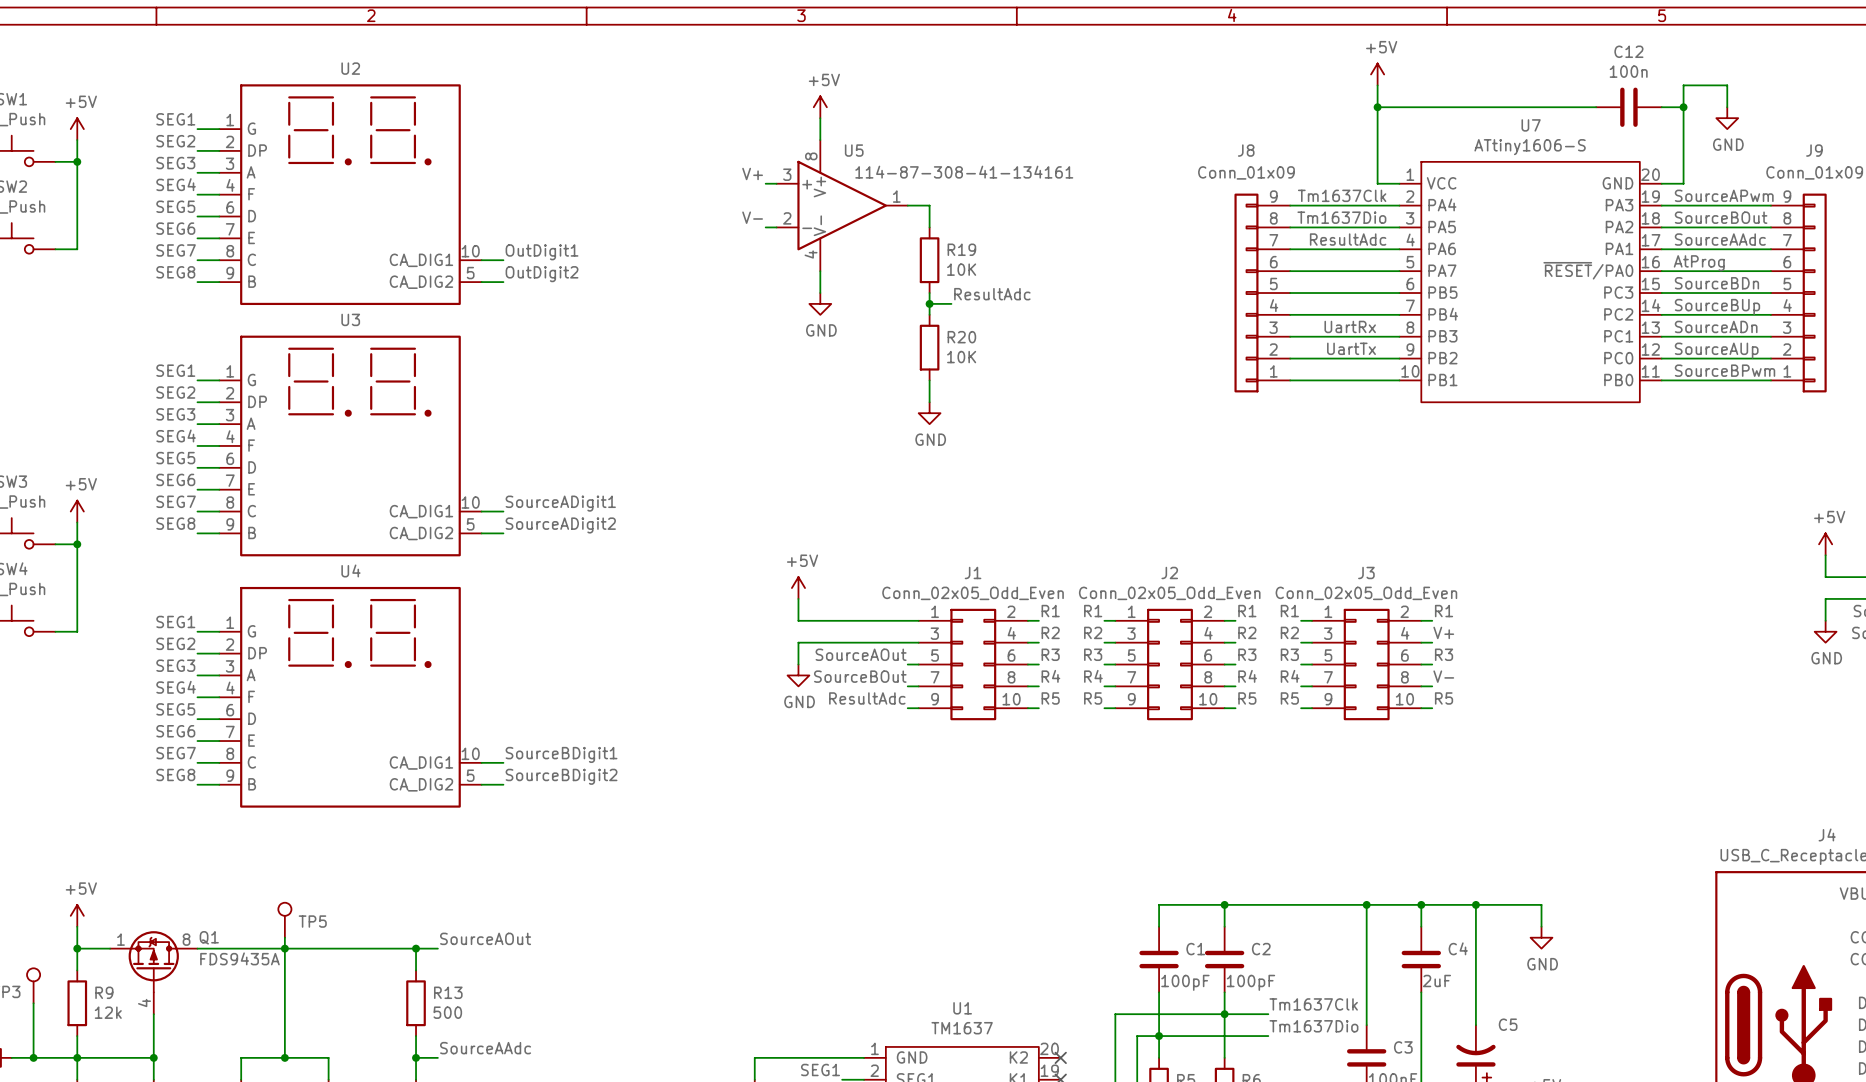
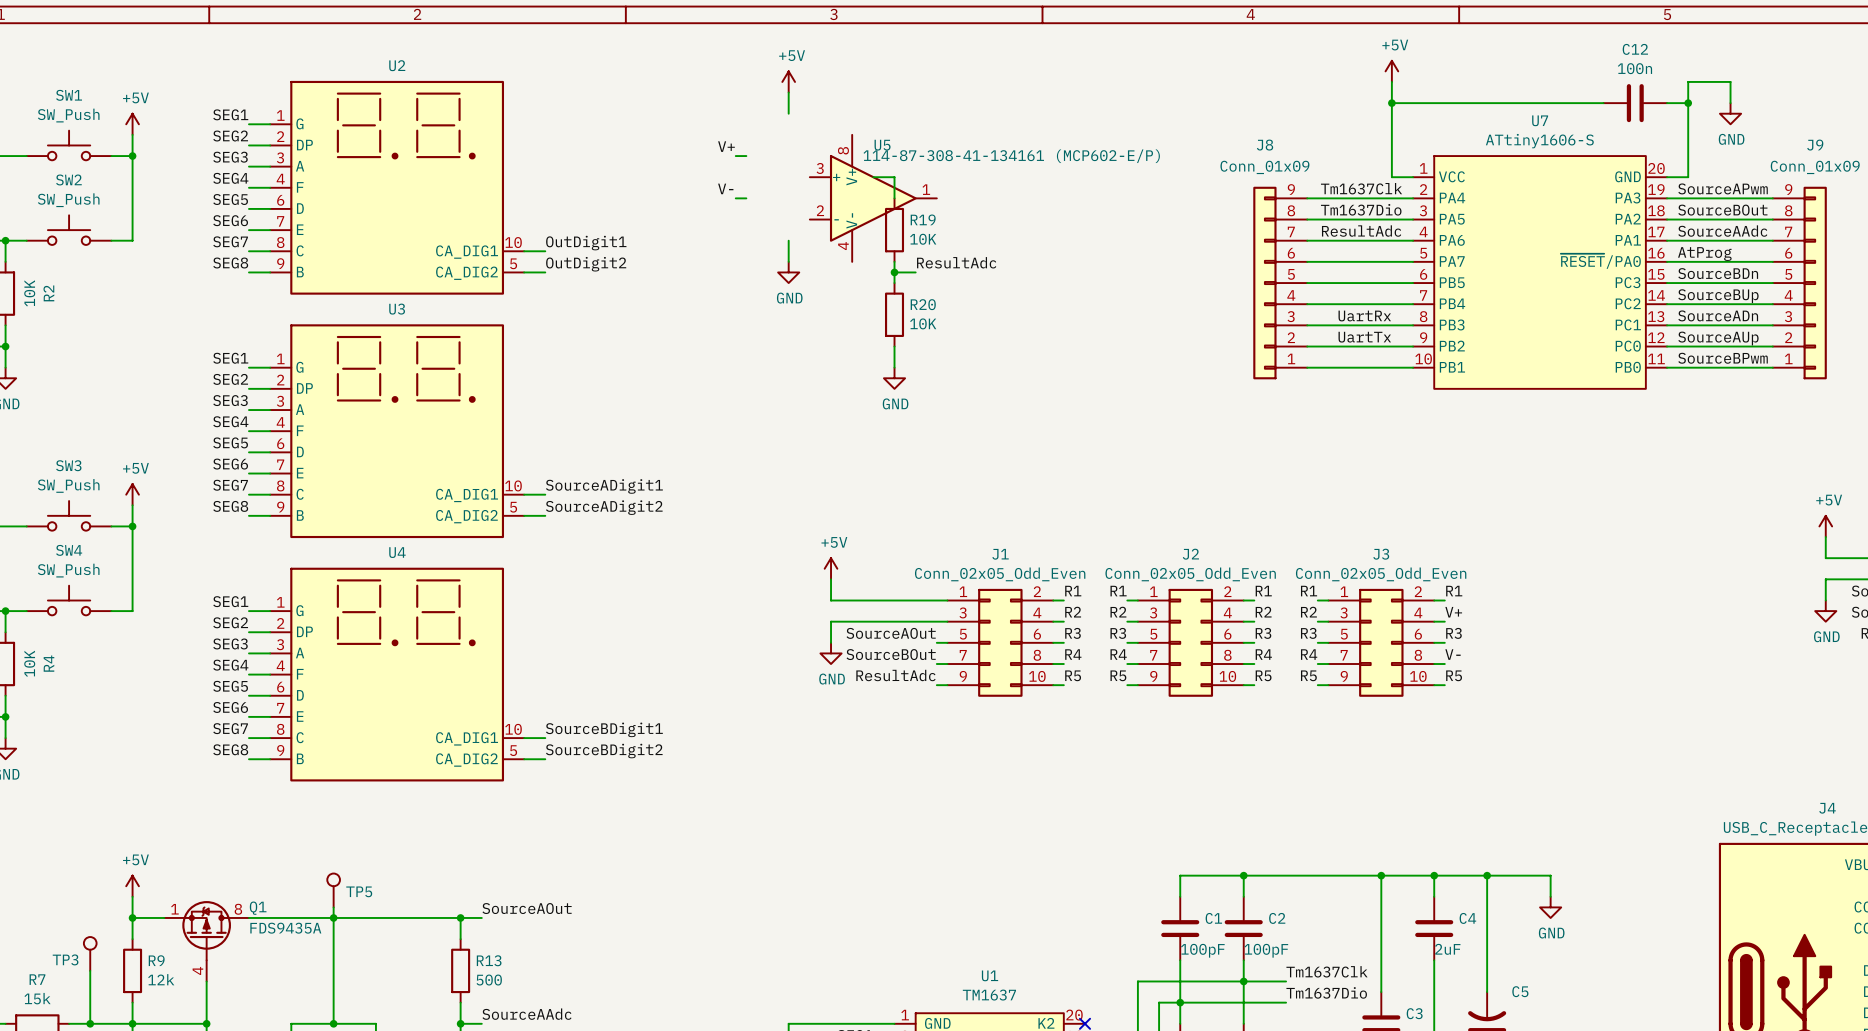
power symbol position: +5V (820, 107) -> +5V (788, 81)
wire: (820, 118) (820, 140) -> (788, 92) (788, 113)
U5 value: 114-87-308-41-134161 (964, 172) -> 114-87-308-41-134161 (MCP602-E/P) (1011, 156)
label position: V+ (752, 173) -> V+ (726, 146)
wire: (765, 183) (776, 183) -> (735, 156) (746, 156)
wire: (907, 205) (929, 205) (929, 227) -> (873, 177) (894, 177) (894, 198)
label position: V- (752, 217) -> V- (725, 188)
wire: (765, 227) (776, 227) -> (735, 198) (746, 198)
R19 position: (929, 260) -> (894, 230)
wire: (820, 271) (820, 293) -> (788, 240) (788, 261)
power symbol: none -> GND (788, 272)
junction: none -> (894, 272)
wire: (929, 293) (929, 314) -> (894, 261) (894, 283)
label position: ResultAdc (992, 294) -> ResultAdc (956, 262)
power symbol: GND (820, 303) -> none
wire: (929, 303) (951, 303) -> (894, 272) (915, 272)
junction: (929, 303) -> none
R20 position: (929, 347) -> (894, 314)
wire: (929, 380) (929, 402) -> (894, 346) (894, 367)
power symbol: none -> GND (894, 378)
power symbol: GND (929, 413) -> none

